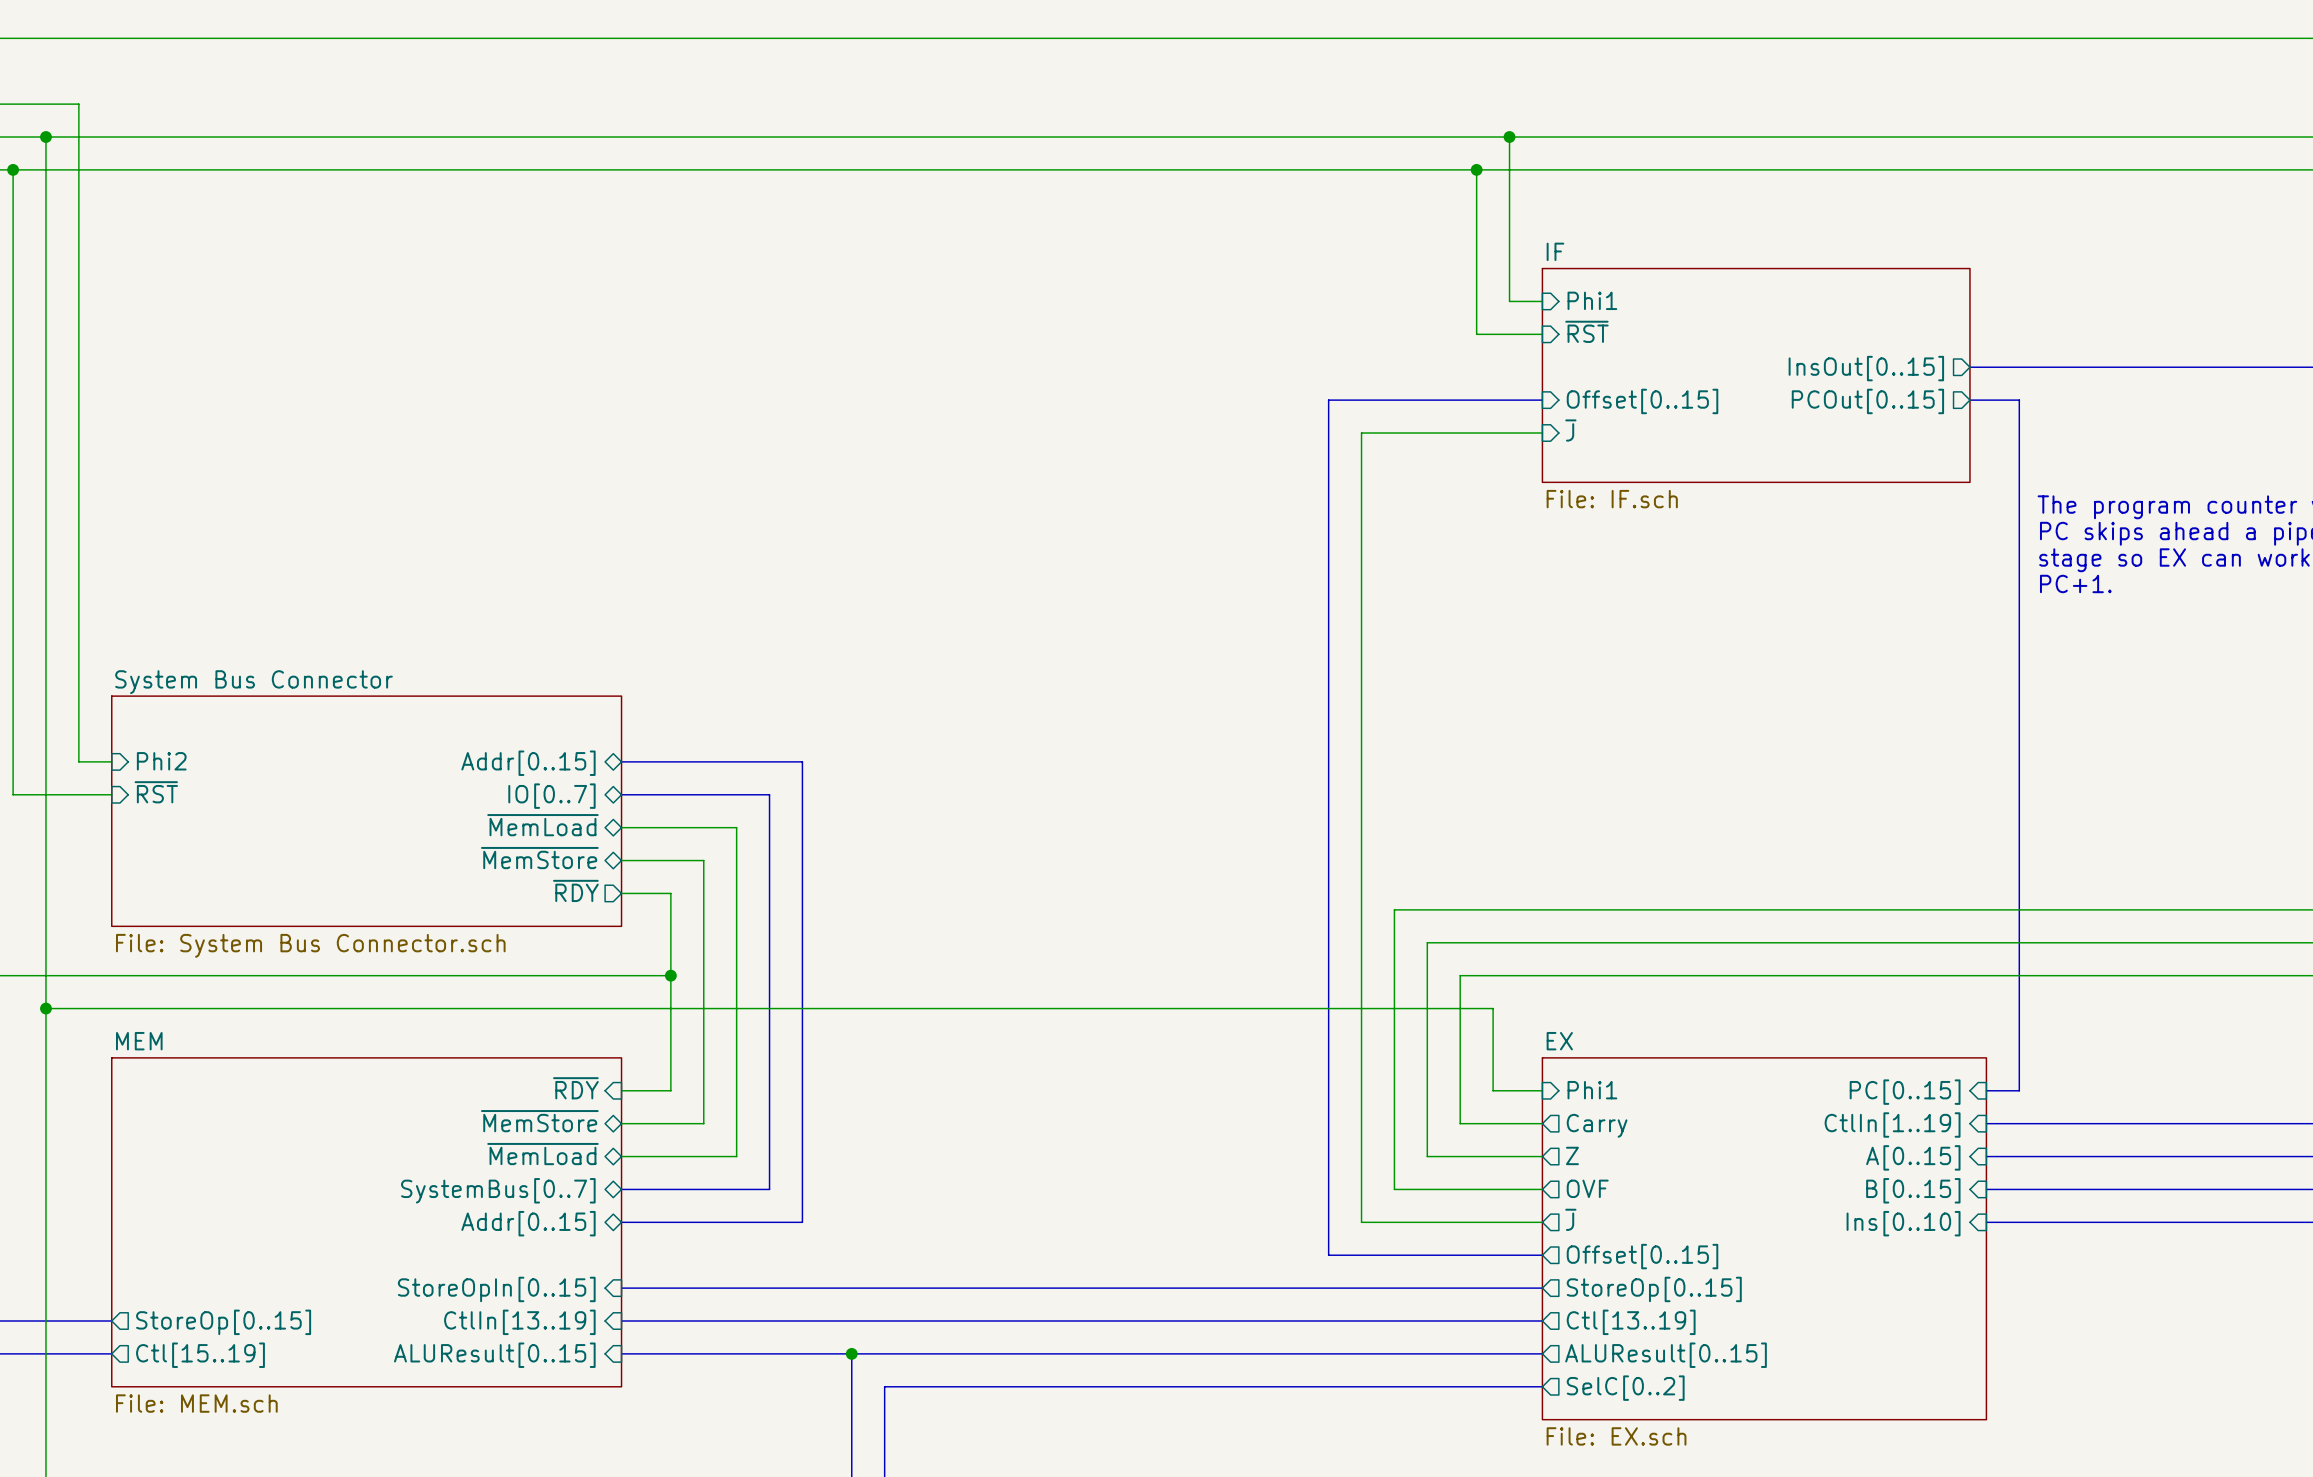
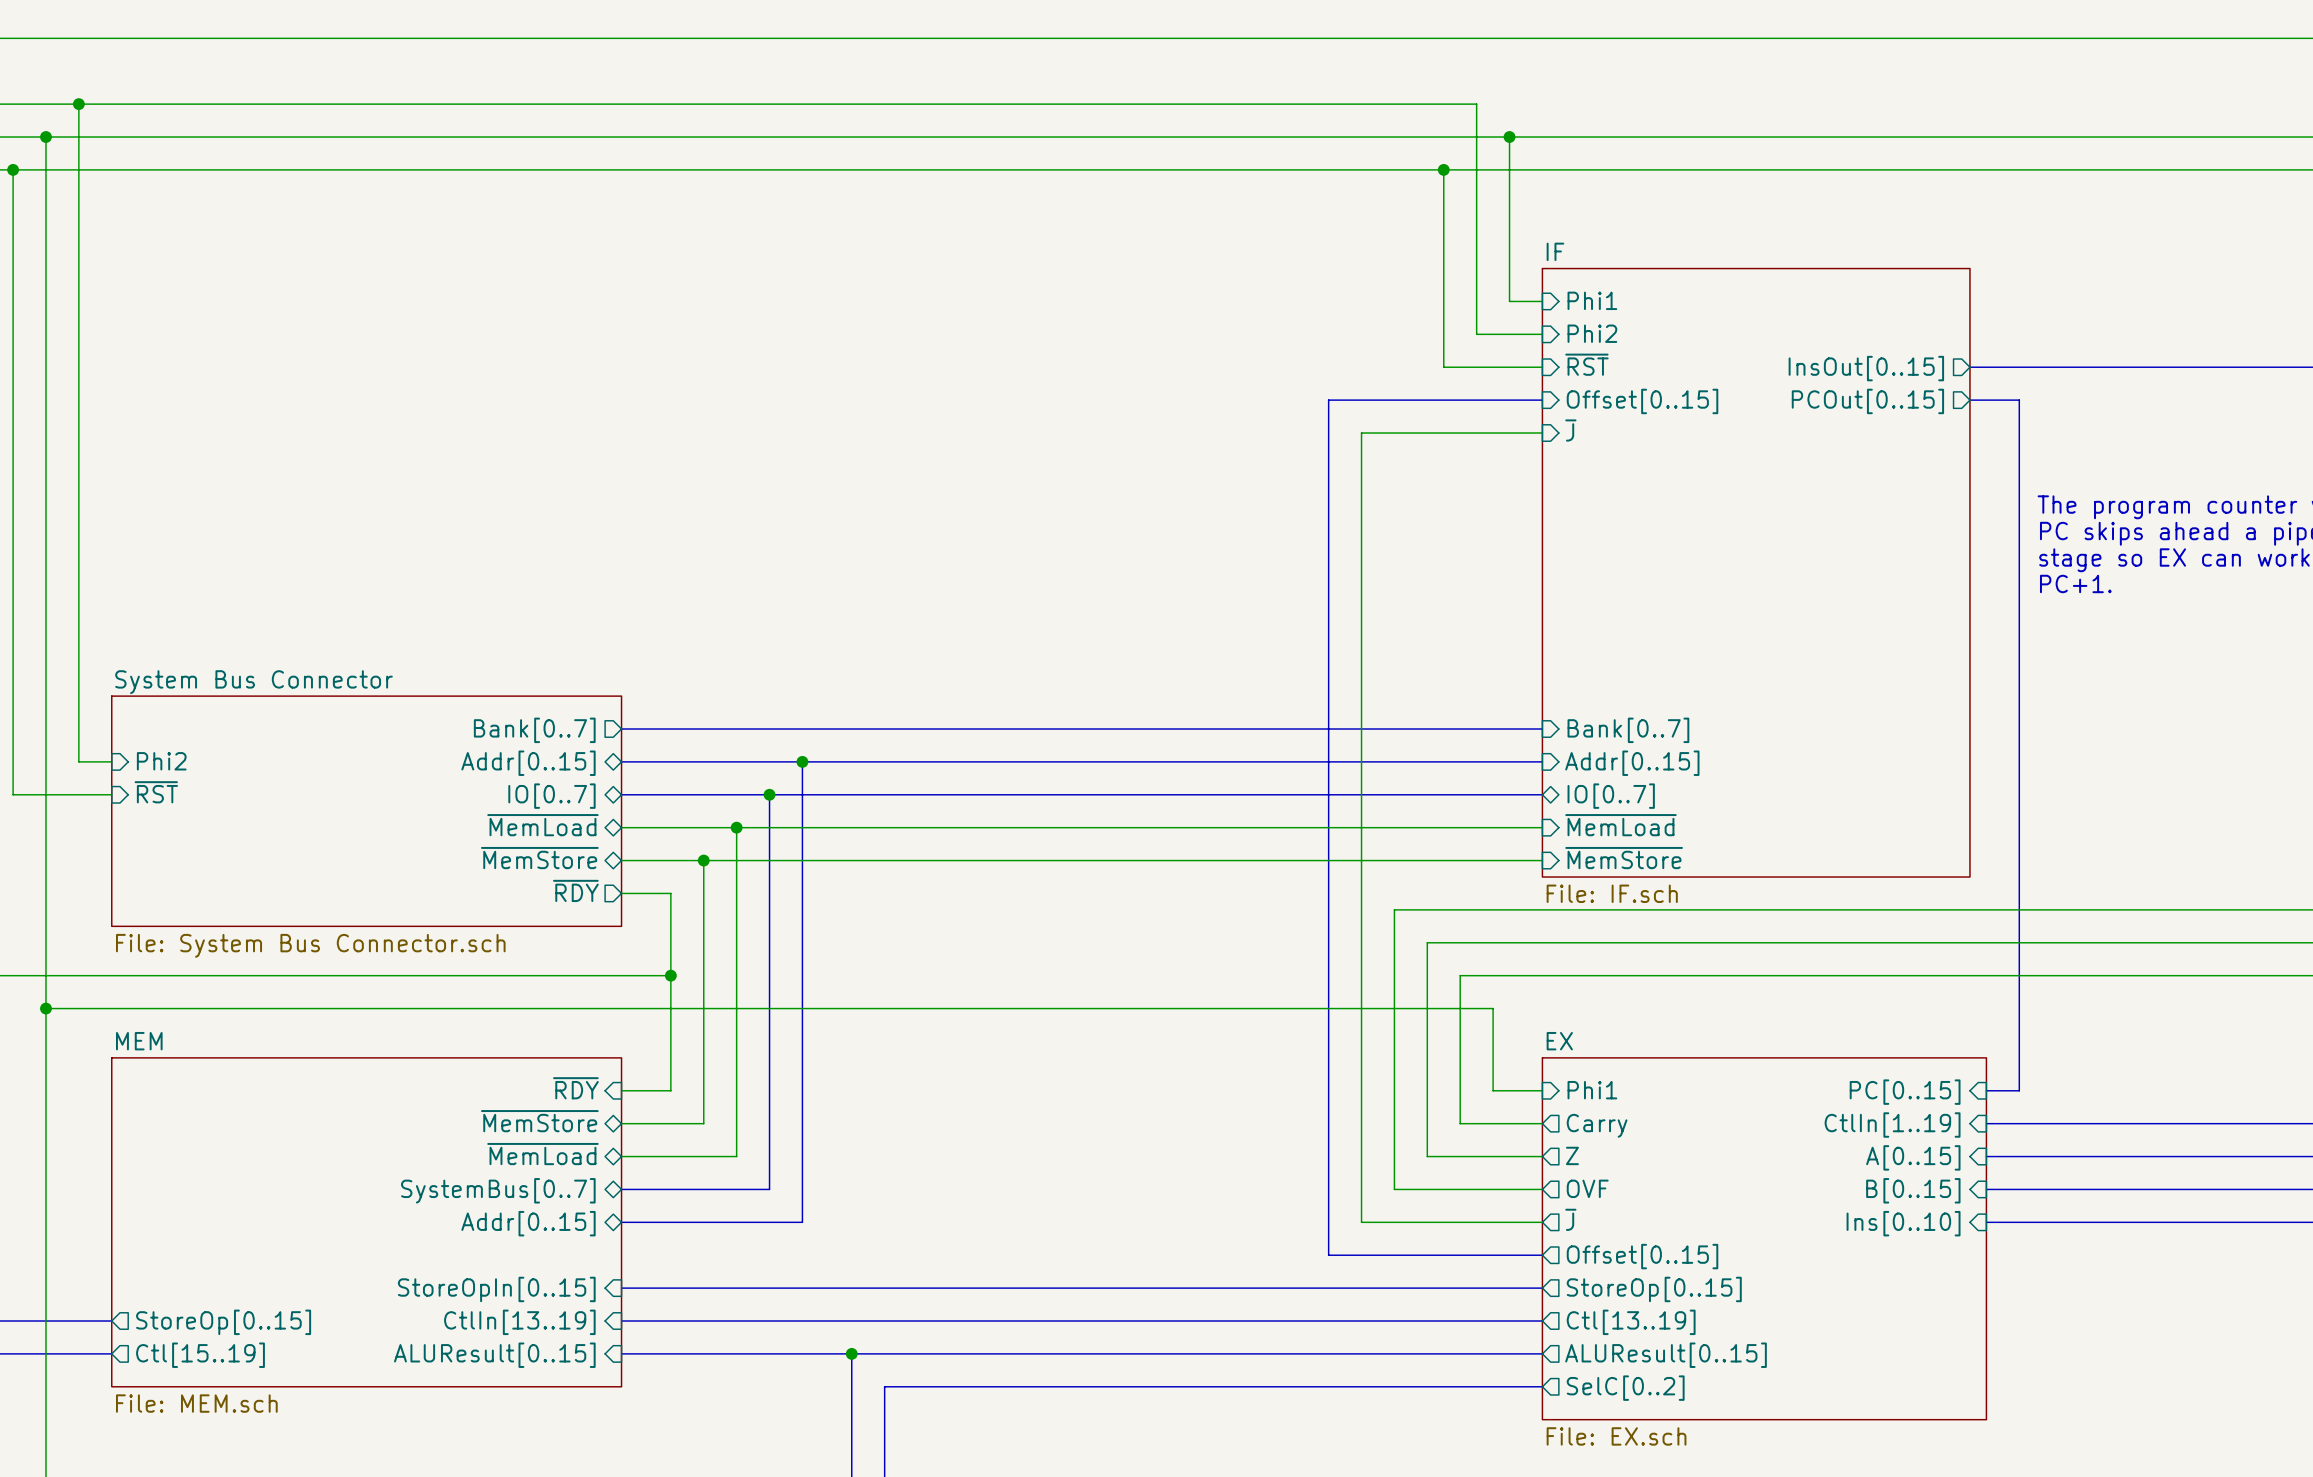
wire: none -> (78, 104) (1476, 104) (1476, 169)
junction: none -> (78, 104)
wire: none -> (1443, 169) (1443, 367) (1542, 367)
junction position: (1476, 169) -> (1443, 169)
sheet pin: ~{RST} (1586, 331) -> Phi2 (1592, 333)
sheet pin: none -> ~{RST} (1586, 364)
sheet IF: File: IF.sch (1756, 375) -> none
sheet IF: none -> File: IF.sch (1756, 572)
bus: none -> (621, 729) (1542, 729)
sheet pin: none -> Bank[0..7] (534, 730)
sheet pin: none -> Bank[0..7] (1628, 730)
bus: none -> (802, 761) (1542, 761)
junction: none -> (802, 761)
sheet pin: none -> Addr[0..15] (1632, 763)
bus: none -> (769, 794) (1542, 794)
junction: none -> (769, 794)
sheet pin: none -> IO[0..7] (1611, 796)
sheet pin: none -> ~{MemLoad} (1620, 825)
wire: none -> (736, 827) (1542, 827)
junction: none -> (736, 827)
sheet pin: none -> ~{MemStore} (1624, 858)
wire: none -> (703, 860) (1542, 860)
junction: none -> (703, 860)

